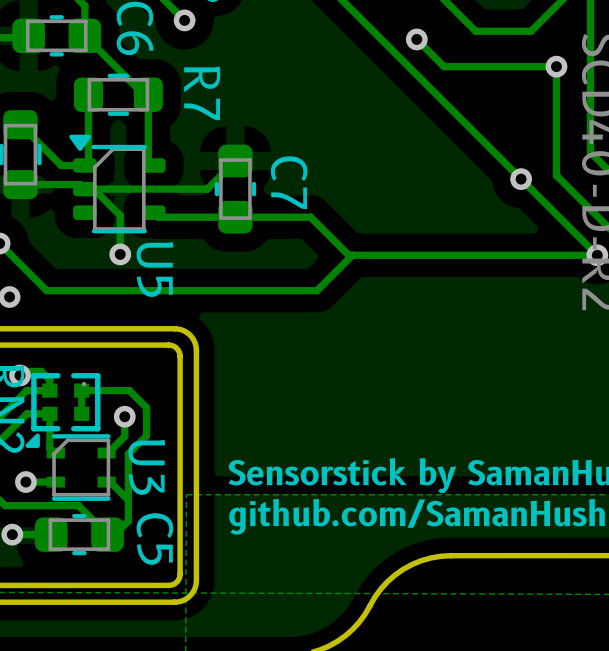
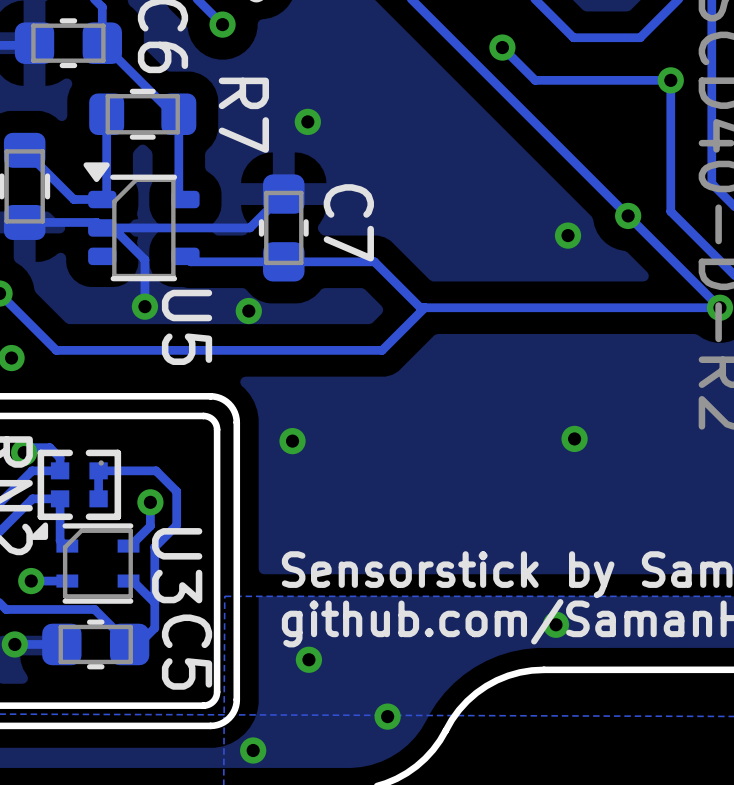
via: none -> (307, 121)
via: none -> (568, 235)
via: none -> (248, 311)
via: none -> (574, 438)
via: none -> (292, 441)
via: none -> (555, 624)
via: none -> (308, 659)
via: none -> (387, 716)
via: none -> (253, 750)

